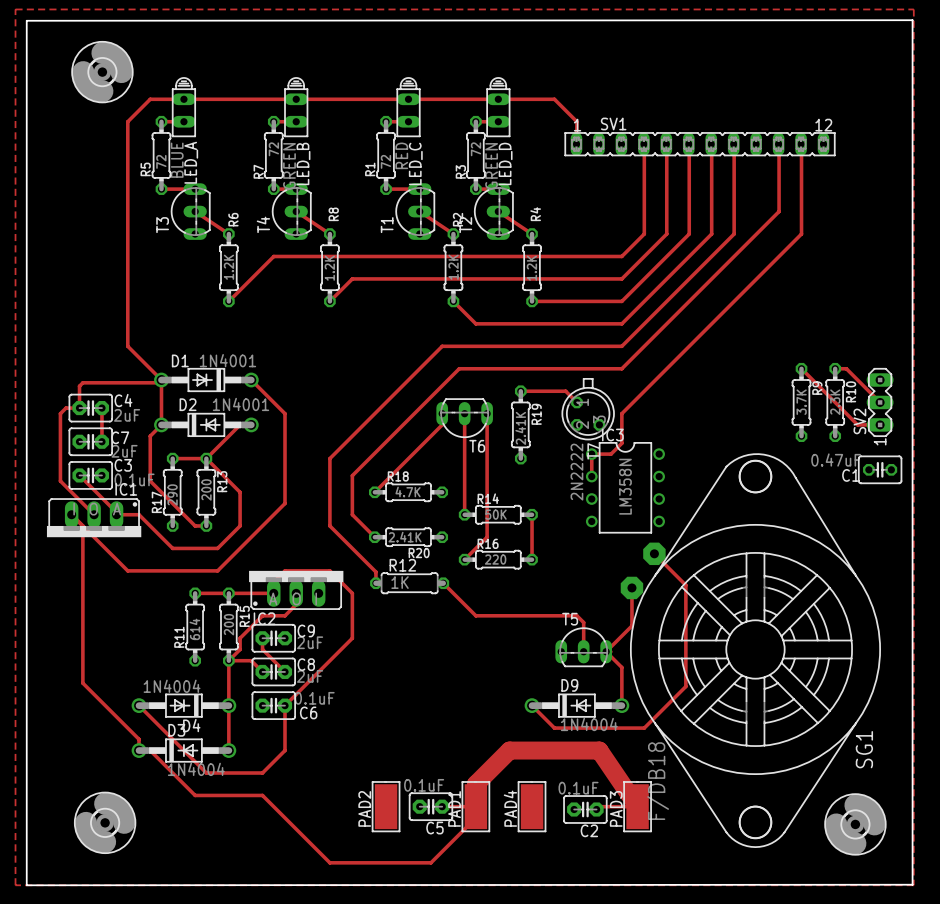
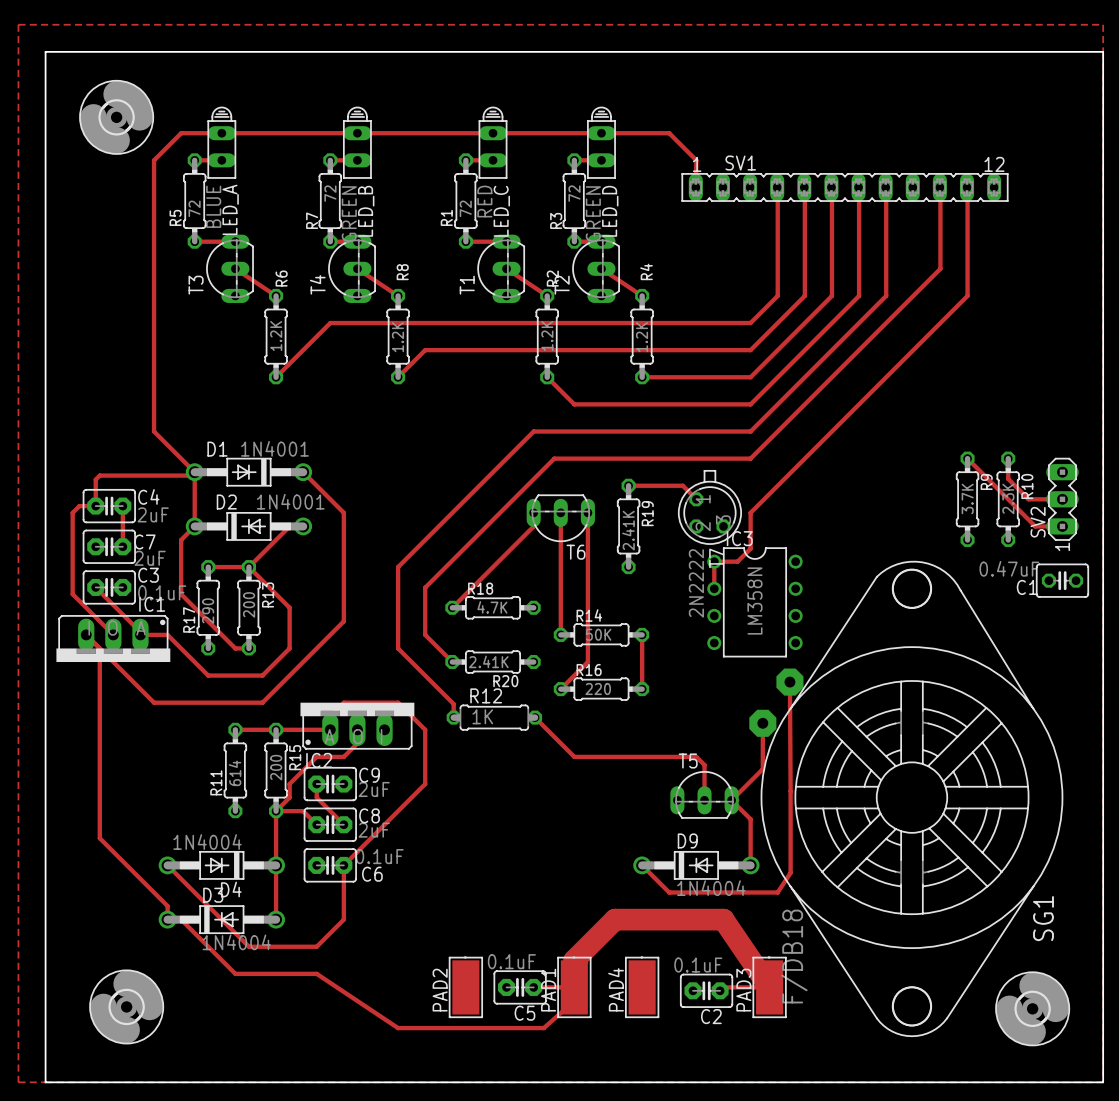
board edge: (912, 20) (912, 884) (26, 885) (26, 20) (912, 20) -> (45, 51) (45, 1082) (1103, 1082) (1103, 51) (45, 51)
part position: (102, 72) -> (116, 117)
track: (835, 368) (846, 368) (880, 402) -> (1008, 458) (1008, 478) (1028, 499) (1062, 499)
track: (654, 553) (685, 585) (685, 686) (644, 728) -> (789, 682) (790, 872) (777, 892)
track: (262, 795) (329, 862) (430, 862) (475, 817) -> (316, 973) (398, 1028) (543, 1028) (574, 1000)

